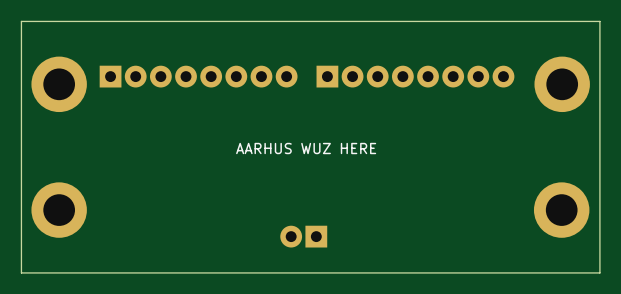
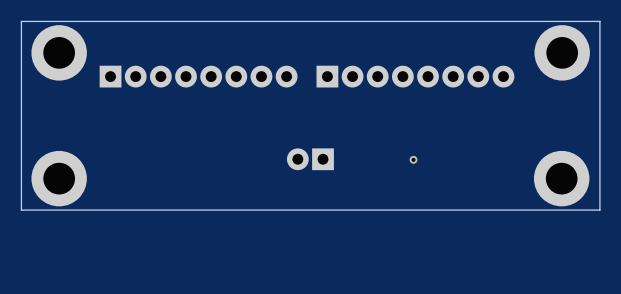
part position: (59, 84) -> (59, 52)
part position: (562, 84) -> (562, 52)
text: AARHUS WUZ HERE (306, 148) -> none
via: none -> (413, 159)
part position: (59, 210) -> (59, 178)
part position: (561, 210) -> (561, 178)
board edge: (599, 210) (599, 272) (21, 272) (21, 210) -> (599, 210) (21, 210)
part position: (303, 236) -> (310, 159)

